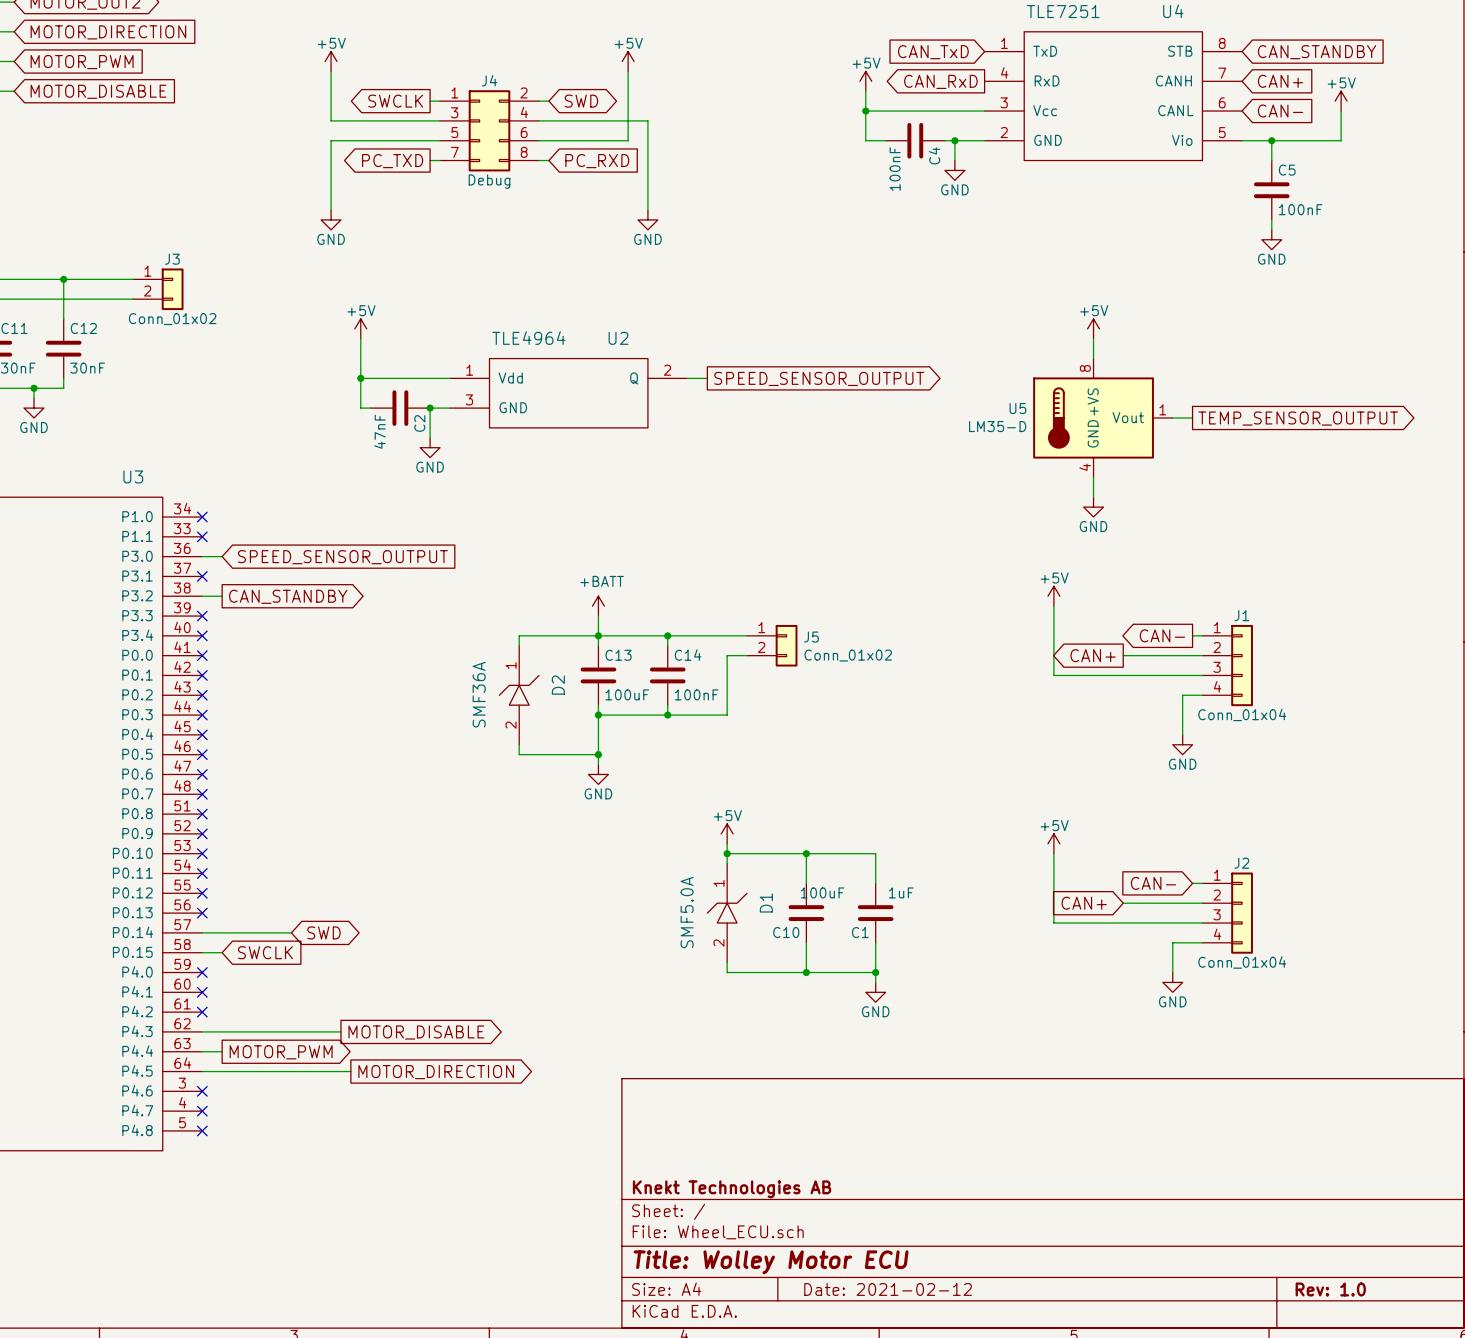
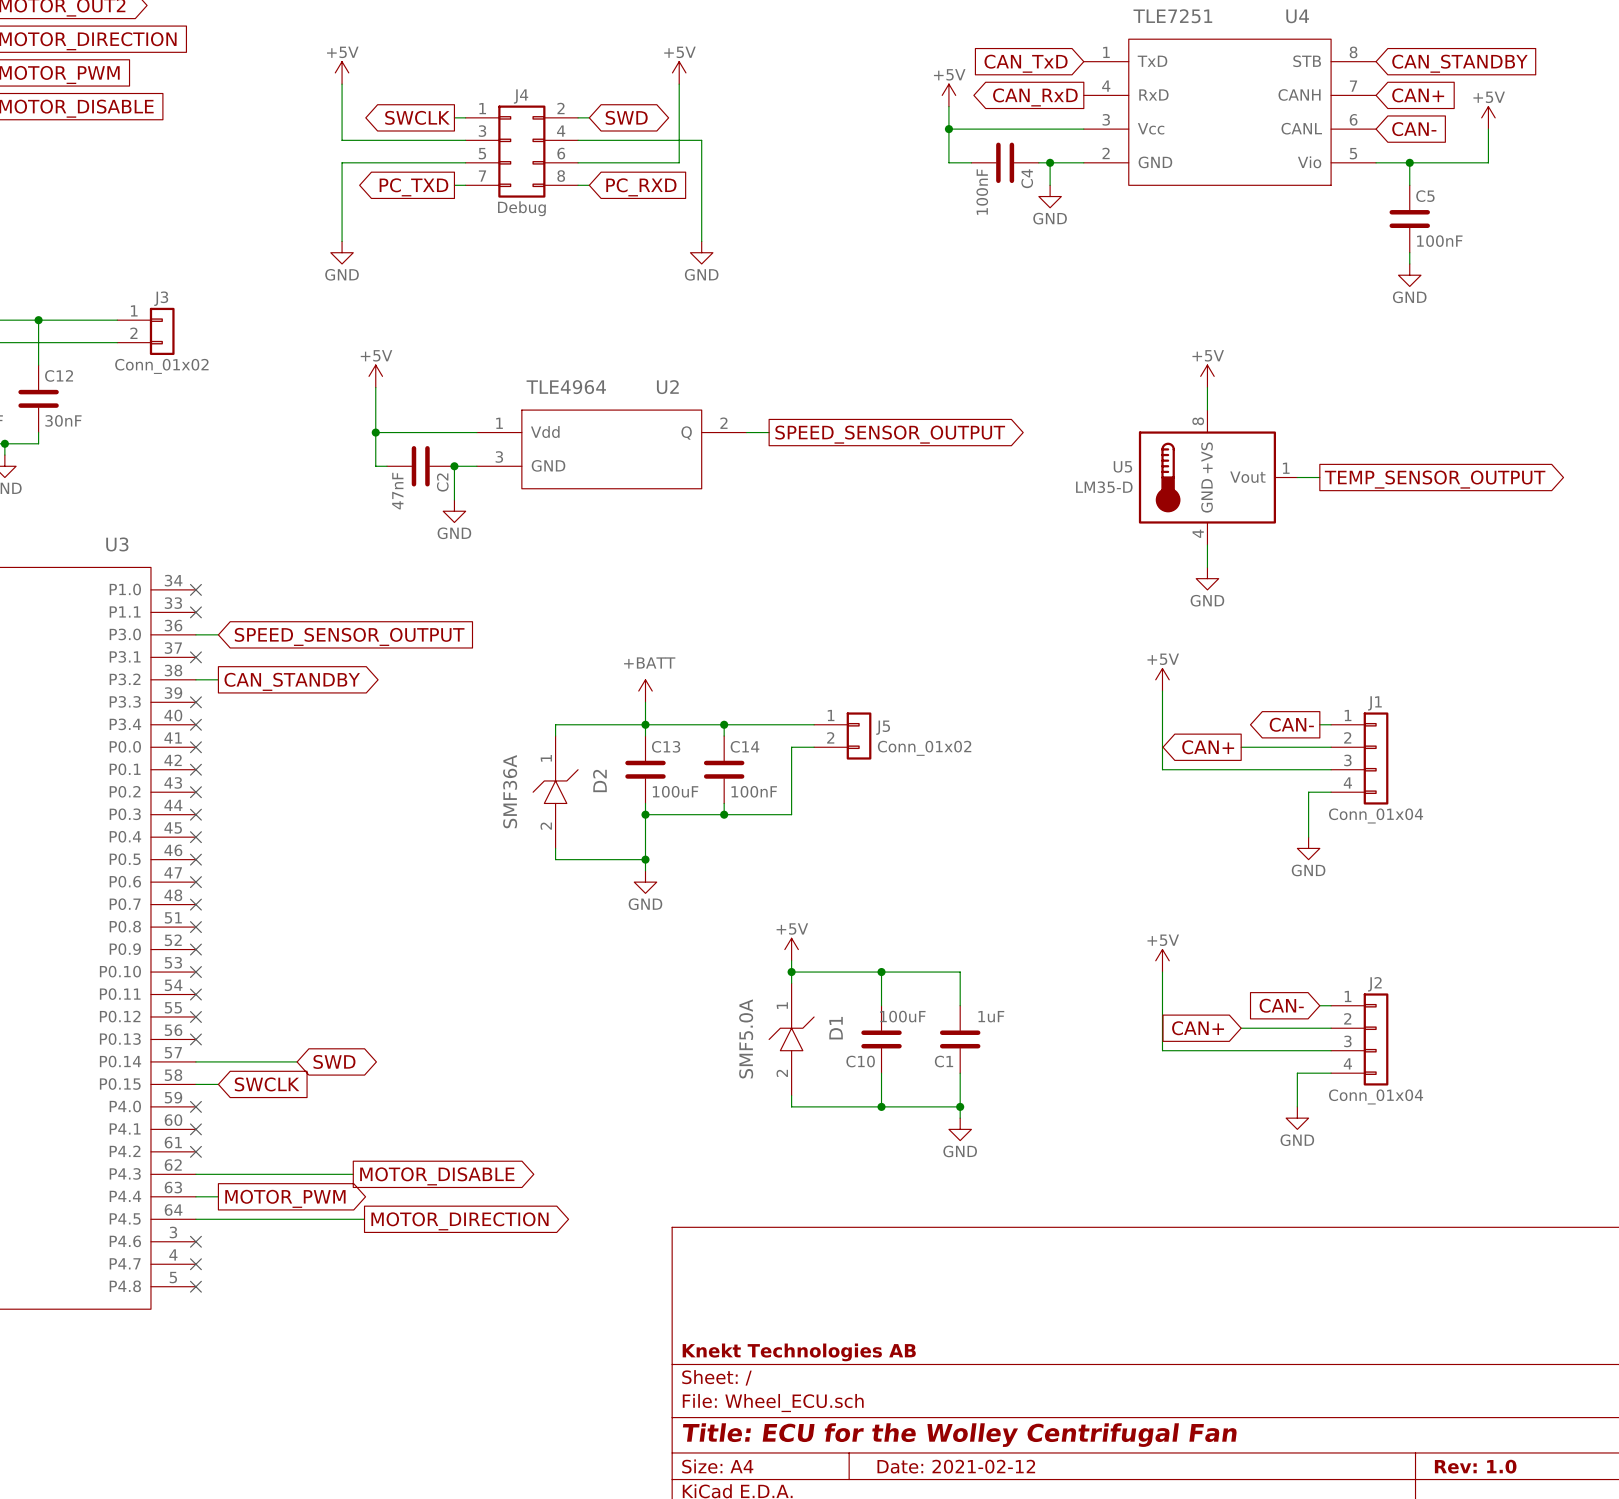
title block: Title: Wolley Motor ECU (771, 1262) -> Title: ECU for the Wolley Centrifugal Fan (959, 1435)

